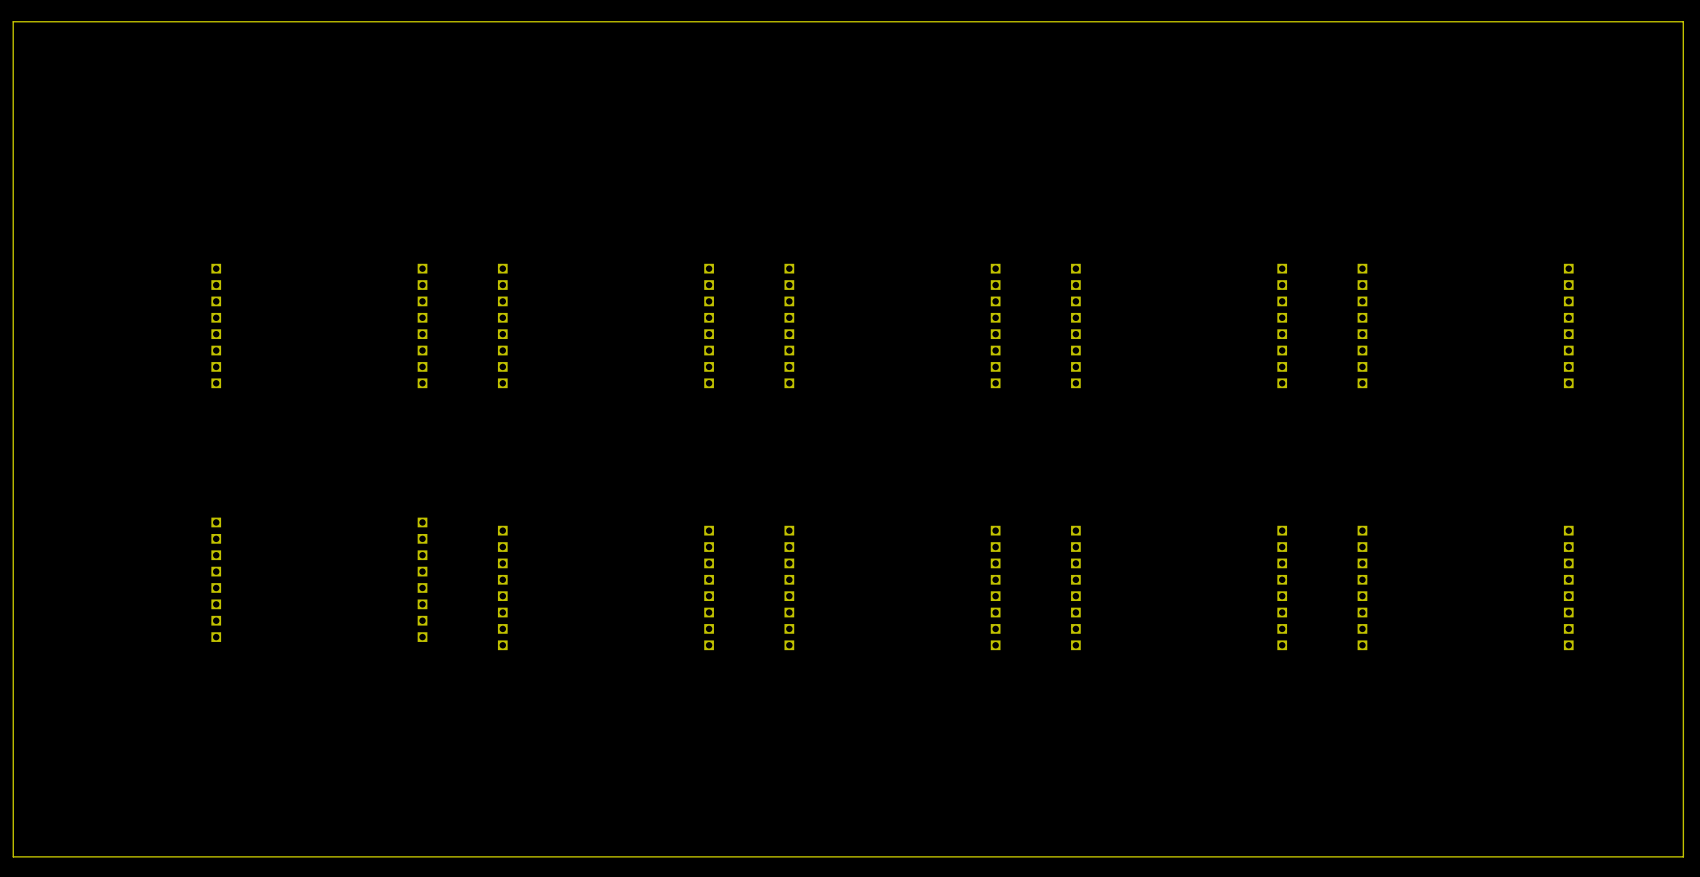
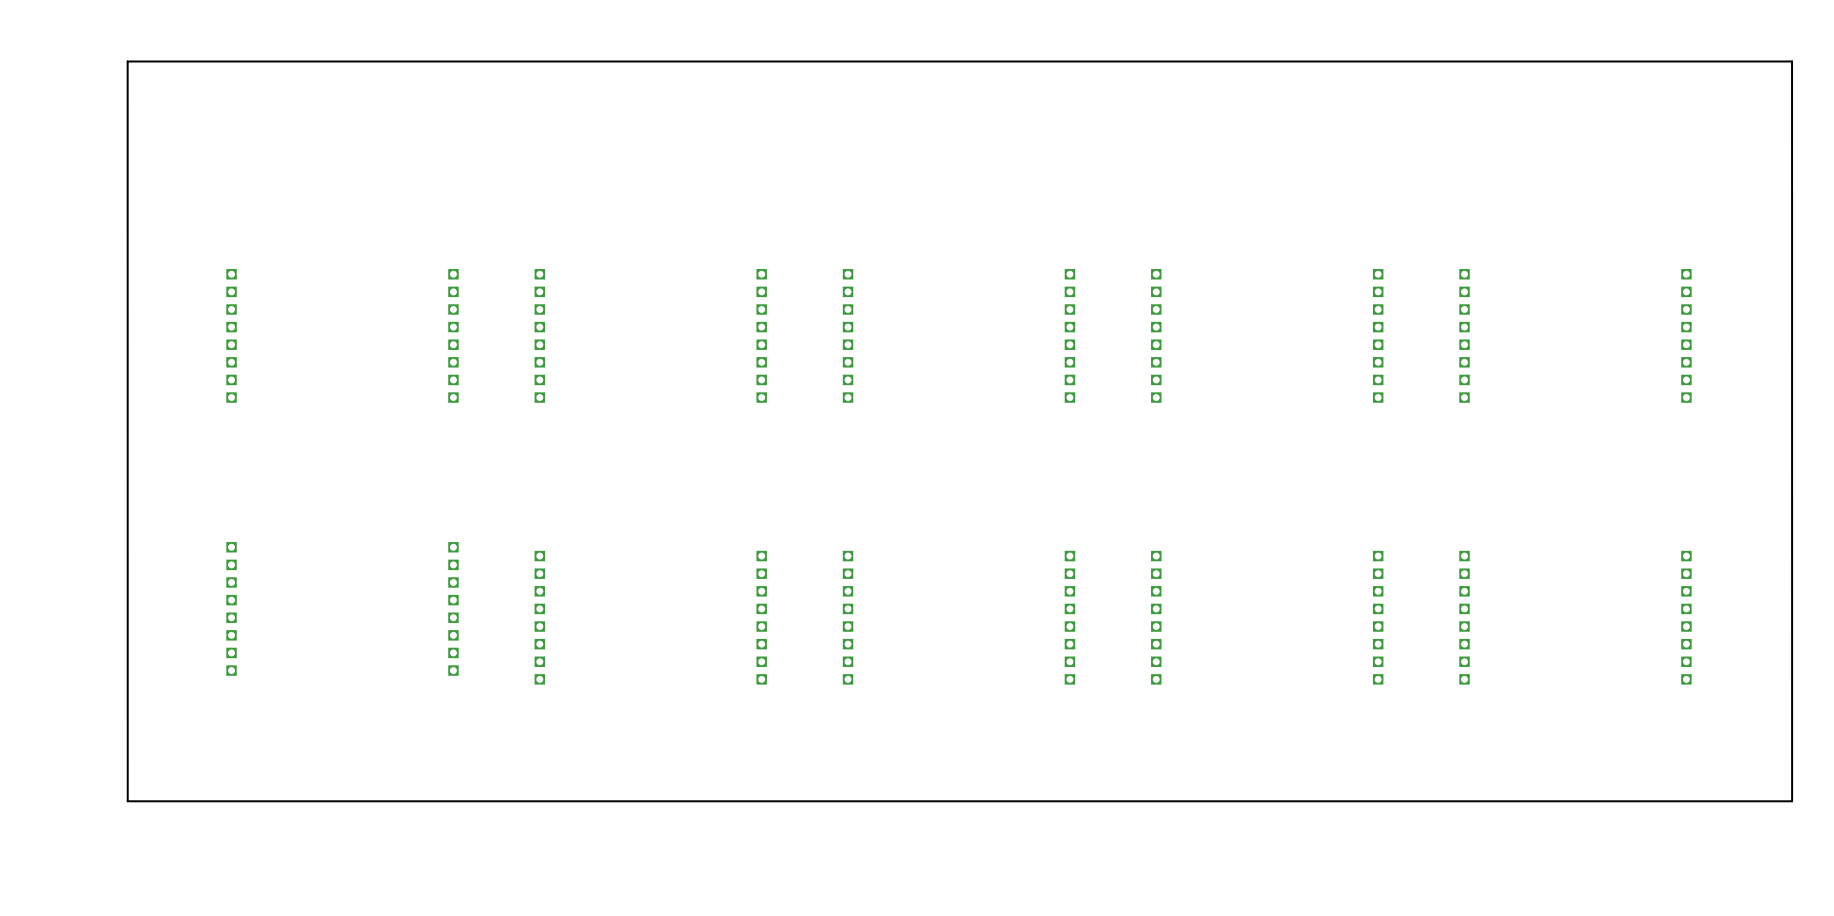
board edge: (1683, 21) (13, 21) (13, 856) (1683, 856) (1683, 21) -> (1792, 61) (1792, 801) (127, 801) (127, 61) (1792, 61)

